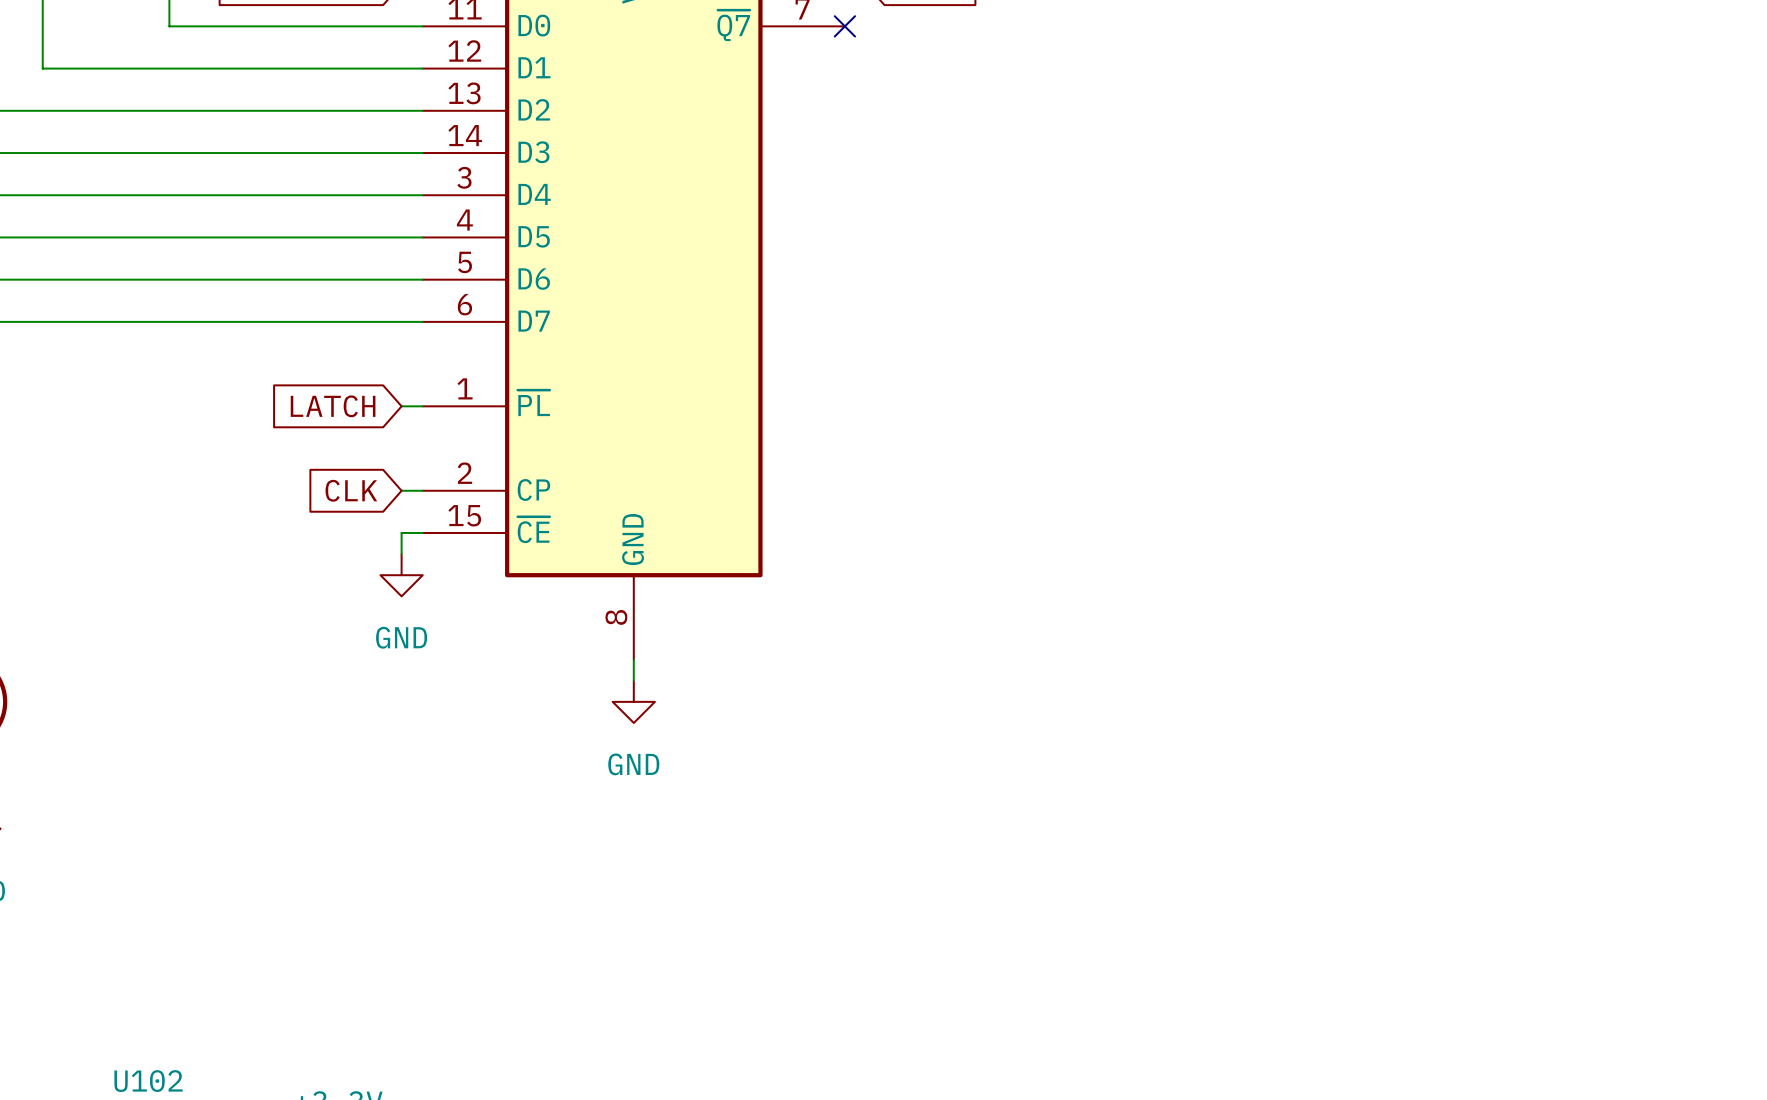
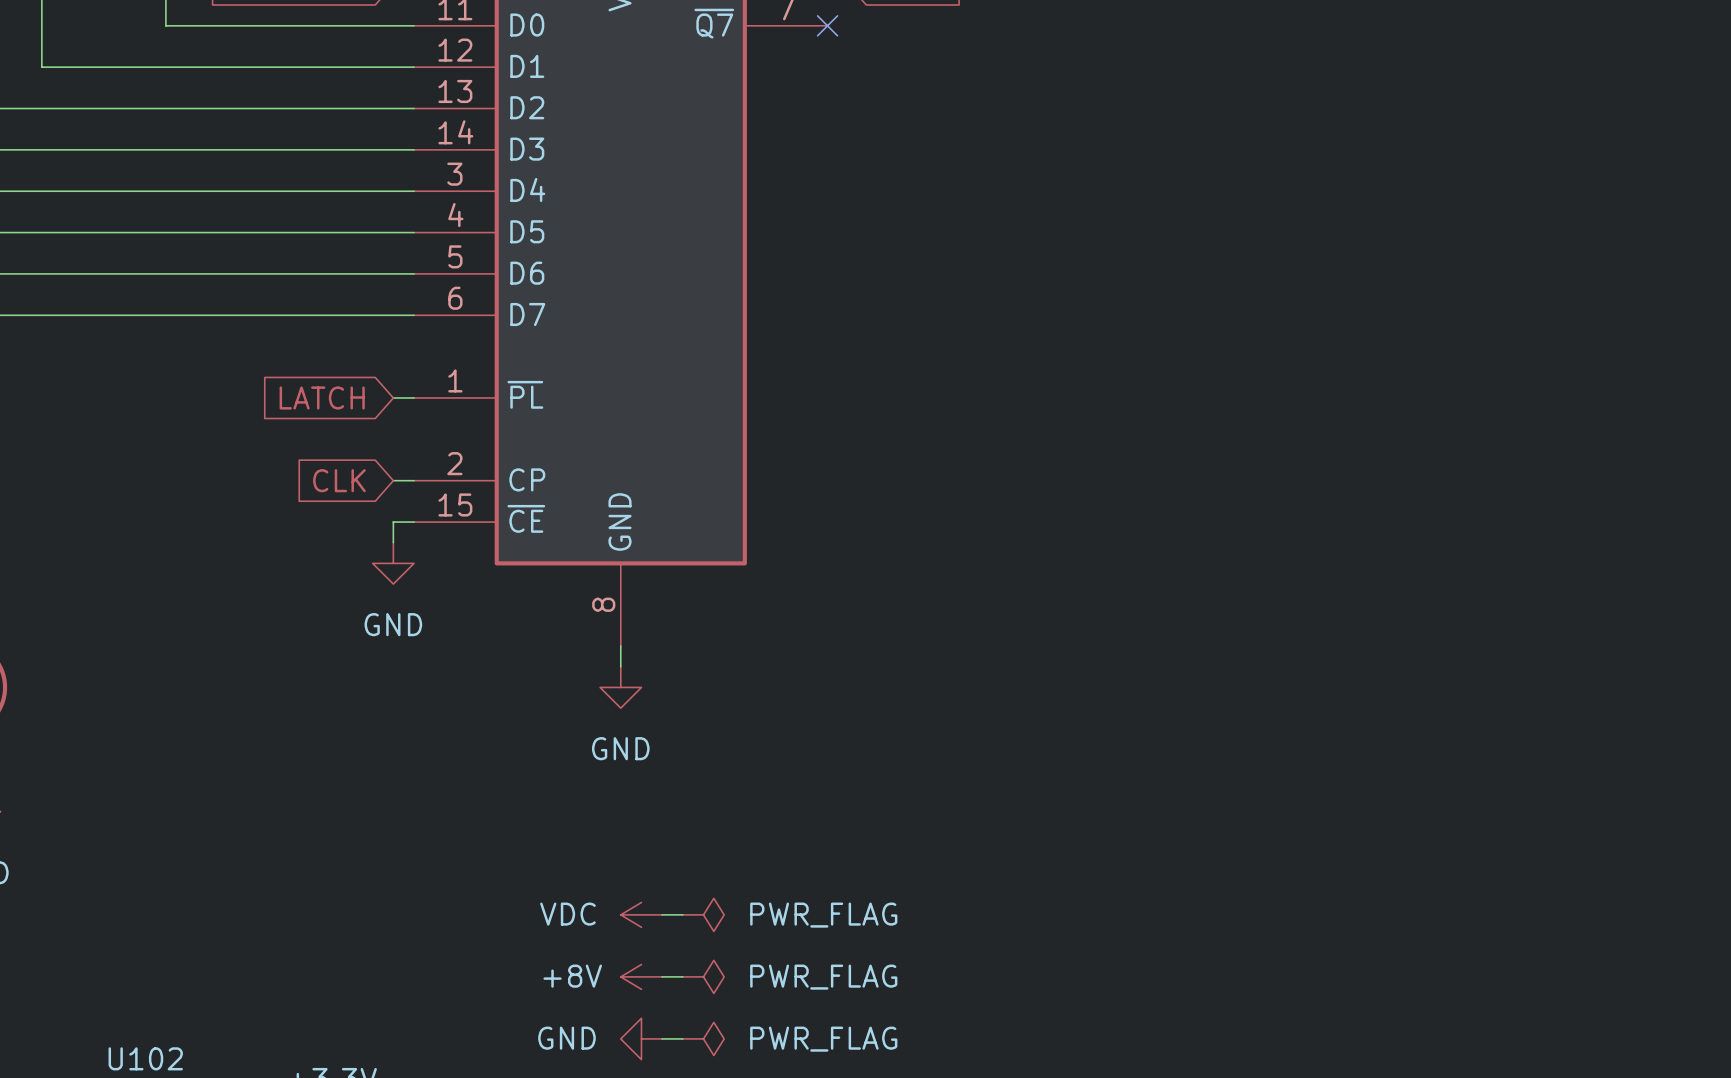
power symbol: none -> VDC (641, 914)
wire: none -> (662, 914) (682, 914)
power symbol: none -> PWR_FLAG (703, 914)
power symbol: none -> +8V (641, 976)
wire: none -> (662, 976) (682, 976)
power symbol: none -> PWR_FLAG (703, 976)
power symbol: none -> GND (641, 1038)
wire: none -> (662, 1038) (682, 1038)
power symbol: none -> PWR_FLAG (703, 1038)

